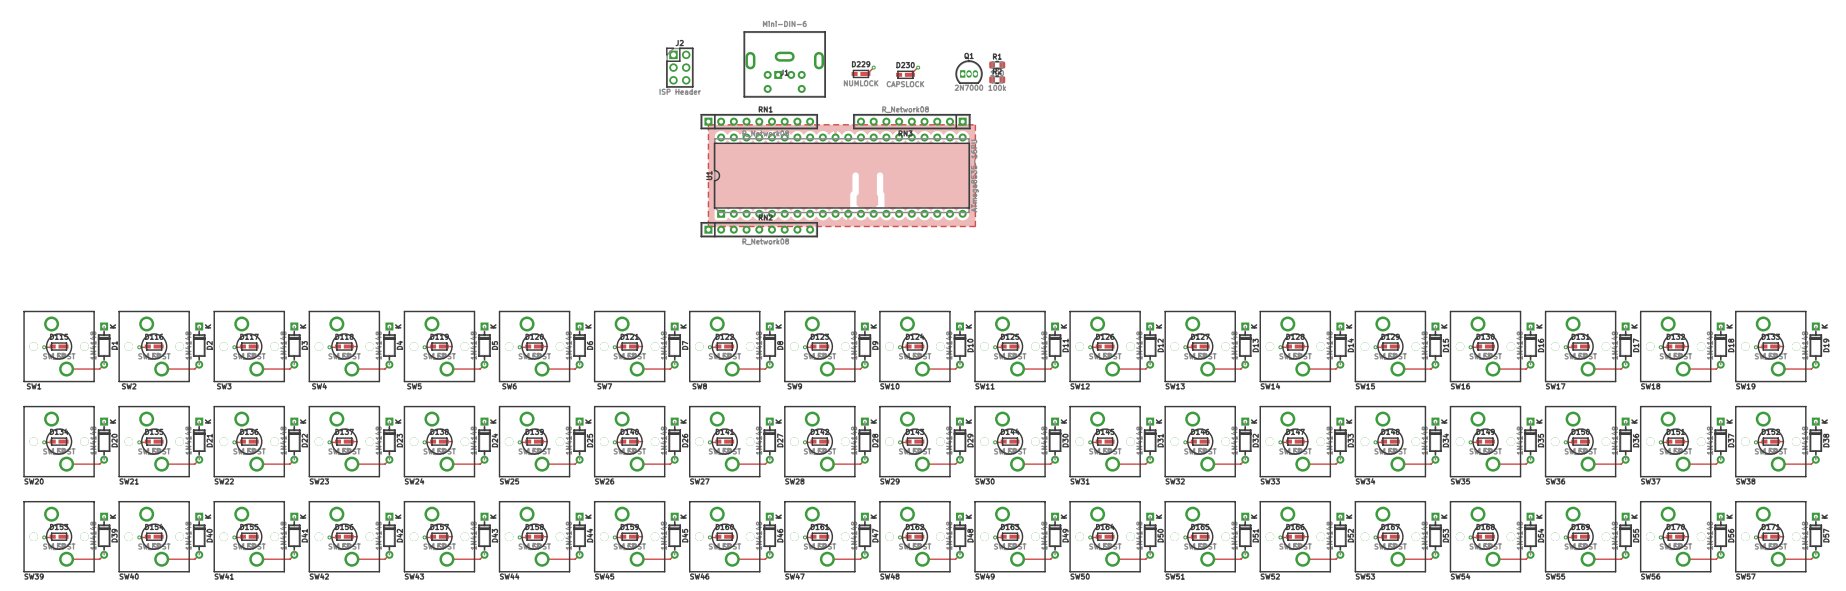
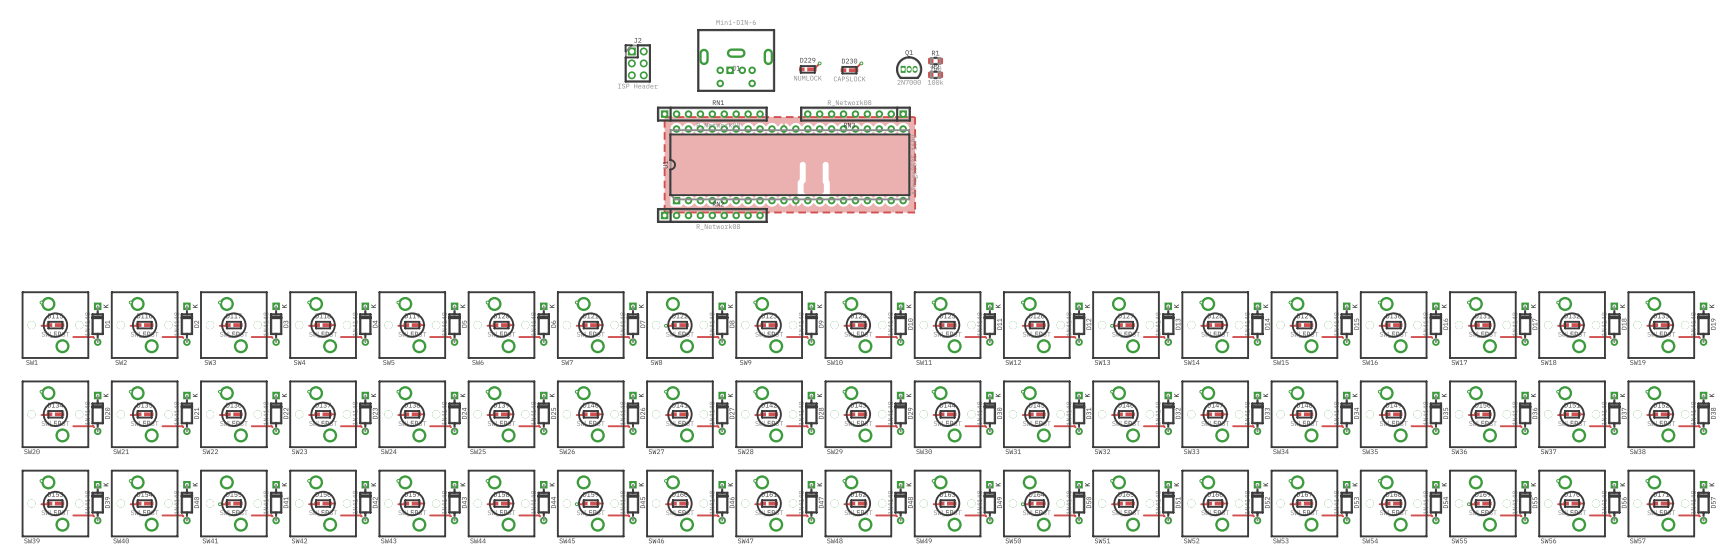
via position: (44, 347) -> (41, 302)
via position: (139, 347) -> (130, 302)
via position: (234, 347) -> (219, 302)
via position: (329, 347) -> (309, 302)
via position: (424, 347) -> (398, 302)
via position: (519, 347) -> (487, 302)
via position: (614, 347) -> (576, 302)
via position: (804, 347) -> (755, 302)
via position: (900, 347) -> (844, 302)
via position: (995, 347) -> (933, 302)
via position: (1090, 347) -> (1022, 302)
via position: (1280, 347) -> (1201, 302)
via position: (1375, 347) -> (1290, 302)
via position: (1470, 347) -> (1379, 302)
via position: (1565, 347) -> (1468, 302)
via position: (1660, 347) -> (1558, 302)
via position: (1755, 347) -> (1647, 302)
track: none -> (73, 337) (94, 338)
track: none -> (162, 337) (183, 338)
track: none -> (251, 337) (272, 338)
track: none -> (340, 337) (361, 338)
track: none -> (430, 337) (451, 338)
track: none -> (519, 337) (540, 338)
track: none -> (608, 337) (629, 338)
track: none -> (697, 337) (718, 338)
track: none -> (787, 337) (807, 338)
track: none -> (876, 337) (897, 338)
track: none -> (965, 337) (986, 338)
track: none -> (1054, 337) (1075, 338)
track: none -> (1143, 337) (1164, 338)
track: none -> (1233, 337) (1253, 338)
track: none -> (1322, 337) (1343, 338)
track: none -> (1411, 337) (1432, 338)
track: none -> (1500, 337) (1521, 338)
track: none -> (1589, 337) (1610, 338)
track: none -> (1679, 337) (1700, 338)
track: (104, 364) (99, 369) (66, 369) -> none
track: (199, 364) (194, 369) (161, 369) -> none
track: (294, 364) (289, 369) (256, 369) -> none
track: (389, 364) (385, 369) (351, 369) -> none
track: (484, 364) (480, 369) (446, 369) -> none
track: (579, 364) (575, 369) (542, 369) -> none
track: (674, 364) (670, 369) (637, 369) -> none
track: (769, 364) (765, 369) (732, 369) -> none
track: (864, 364) (860, 369) (827, 369) -> none
track: (959, 364) (955, 369) (922, 369) -> none
track: (1055, 364) (1050, 369) (1017, 369) -> none
track: (1150, 364) (1145, 369) (1112, 369) -> none
track: (1245, 364) (1240, 369) (1207, 369) -> none
track: (1340, 364) (1335, 369) (1302, 369) -> none
track: (1435, 364) (1431, 369) (1397, 369) -> none
track: (1530, 364) (1526, 369) (1493, 369) -> none
track: (1625, 364) (1621, 369) (1588, 369) -> none
track: (1720, 364) (1716, 369) (1683, 369) -> none
track: (1815, 364) (1811, 369) (1778, 369) -> none
via position: (44, 442) -> (41, 391)
via position: (139, 442) -> (130, 391)
via position: (234, 442) -> (219, 391)
via position: (329, 442) -> (309, 391)
via position: (424, 442) -> (398, 391)
via position: (519, 442) -> (487, 391)
via position: (614, 442) -> (576, 391)
via position: (709, 442) -> (665, 391)
via position: (804, 442) -> (755, 391)
via position: (900, 442) -> (844, 391)
via position: (995, 442) -> (933, 391)
via position: (1090, 442) -> (1022, 391)
via position: (1185, 442) -> (1112, 391)
via position: (1280, 442) -> (1201, 391)
via position: (1375, 442) -> (1290, 391)
via position: (1470, 442) -> (1379, 391)
via position: (1565, 442) -> (1468, 391)
via position: (1660, 442) -> (1558, 391)
via position: (1755, 442) -> (1647, 391)
track: none -> (73, 426) (94, 427)
track: none -> (162, 426) (183, 427)
track: none -> (251, 426) (272, 427)
track: none -> (340, 426) (361, 427)
track: none -> (430, 426) (451, 427)
track: none -> (519, 426) (540, 427)
track: none -> (608, 426) (629, 427)
track: none -> (697, 426) (718, 427)
track: none -> (787, 426) (807, 427)
track: none -> (876, 426) (897, 427)
track: none -> (965, 426) (986, 427)
track: none -> (1054, 426) (1075, 427)
track: none -> (1143, 426) (1164, 427)
track: none -> (1233, 426) (1253, 427)
track: none -> (1322, 426) (1343, 427)
track: none -> (1411, 426) (1432, 427)
track: none -> (1500, 426) (1521, 427)
track: none -> (1589, 426) (1610, 427)
track: none -> (1679, 426) (1700, 427)
track: (104, 459) (99, 464) (66, 464) -> none
track: (199, 459) (194, 464) (161, 464) -> none
track: (294, 459) (289, 464) (256, 464) -> none
track: (389, 459) (385, 464) (351, 464) -> none
track: (484, 459) (480, 464) (446, 464) -> none
track: (579, 459) (575, 464) (542, 464) -> none
track: (674, 459) (670, 464) (637, 464) -> none
track: (769, 459) (765, 464) (732, 464) -> none
track: (864, 459) (860, 464) (827, 464) -> none
track: (959, 459) (955, 464) (922, 464) -> none
track: (1055, 459) (1050, 464) (1017, 464) -> none
track: (1150, 459) (1145, 464) (1112, 464) -> none
track: (1245, 459) (1240, 464) (1207, 464) -> none
track: (1340, 459) (1335, 464) (1302, 464) -> none
track: (1435, 459) (1431, 464) (1397, 464) -> none
track: (1530, 459) (1526, 464) (1493, 464) -> none
track: (1625, 459) (1621, 464) (1588, 464) -> none
track: (1720, 459) (1716, 464) (1683, 464) -> none
track: (1815, 459) (1811, 464) (1778, 464) -> none
via position: (44, 537) -> (41, 480)
via position: (139, 537) -> (130, 480)
via position: (329, 537) -> (309, 480)
via position: (424, 537) -> (398, 480)
via position: (519, 537) -> (487, 480)
via position: (709, 537) -> (665, 480)
via position: (804, 537) -> (755, 480)
via position: (900, 537) -> (844, 480)
via position: (995, 537) -> (933, 480)
via position: (1185, 537) -> (1112, 480)
via position: (1280, 537) -> (1201, 480)
via position: (1375, 537) -> (1290, 480)
via position: (1470, 537) -> (1379, 480)
via position: (1660, 537) -> (1558, 480)
via position: (1755, 537) -> (1647, 480)
track: none -> (73, 515) (94, 516)
track: none -> (162, 515) (183, 516)
track: none -> (251, 515) (272, 516)
track: none -> (340, 515) (361, 516)
track: none -> (430, 515) (451, 516)
track: none -> (519, 515) (540, 516)
track: none -> (608, 515) (629, 516)
track: none -> (697, 515) (718, 516)
track: none -> (787, 515) (807, 516)
track: none -> (876, 515) (897, 516)
track: none -> (965, 515) (986, 516)
track: none -> (1054, 515) (1075, 516)
track: none -> (1143, 515) (1164, 516)
track: none -> (1233, 515) (1253, 516)
track: none -> (1322, 515) (1343, 516)
track: none -> (1411, 515) (1432, 516)
track: none -> (1500, 515) (1521, 516)
track: none -> (1589, 515) (1610, 516)
track: none -> (1679, 515) (1700, 516)
track: (104, 554) (99, 559) (66, 559) -> none
track: (199, 554) (194, 559) (161, 559) -> none
track: (294, 554) (289, 559) (256, 559) -> none
track: (389, 554) (385, 559) (351, 559) -> none
track: (484, 554) (480, 559) (446, 559) -> none
track: (579, 554) (575, 559) (542, 559) -> none
track: (674, 554) (670, 559) (637, 559) -> none
track: (769, 554) (765, 559) (732, 559) -> none
track: (864, 554) (860, 559) (827, 559) -> none
track: (959, 554) (955, 559) (922, 559) -> none
track: (1055, 554) (1050, 559) (1017, 559) -> none
track: (1150, 554) (1145, 559) (1112, 559) -> none
track: (1245, 554) (1240, 559) (1207, 559) -> none
track: (1340, 554) (1335, 559) (1302, 559) -> none
track: (1435, 554) (1431, 559) (1397, 559) -> none
track: (1530, 554) (1526, 559) (1493, 559) -> none
track: (1625, 554) (1621, 559) (1588, 559) -> none
track: (1720, 554) (1716, 559) (1683, 559) -> none
track: (1815, 554) (1811, 559) (1778, 559) -> none

